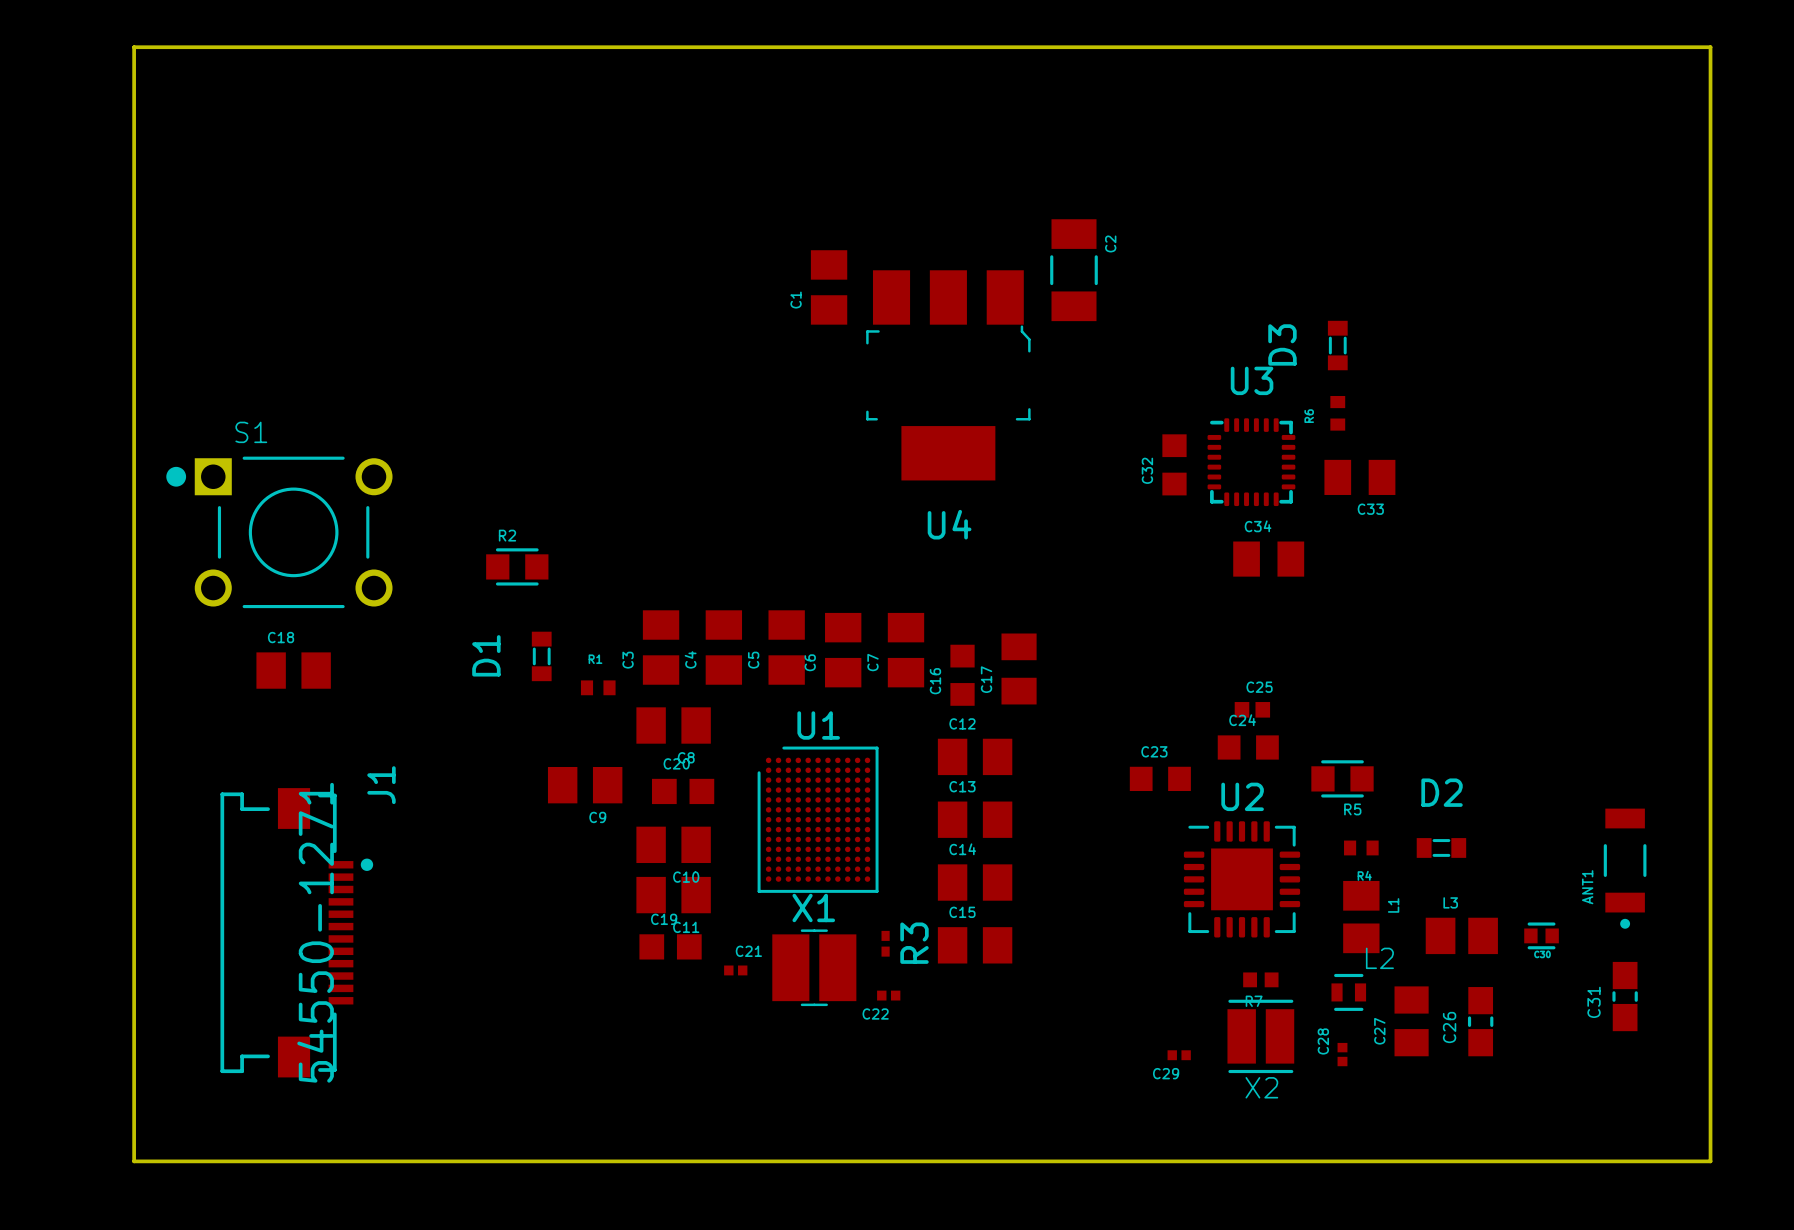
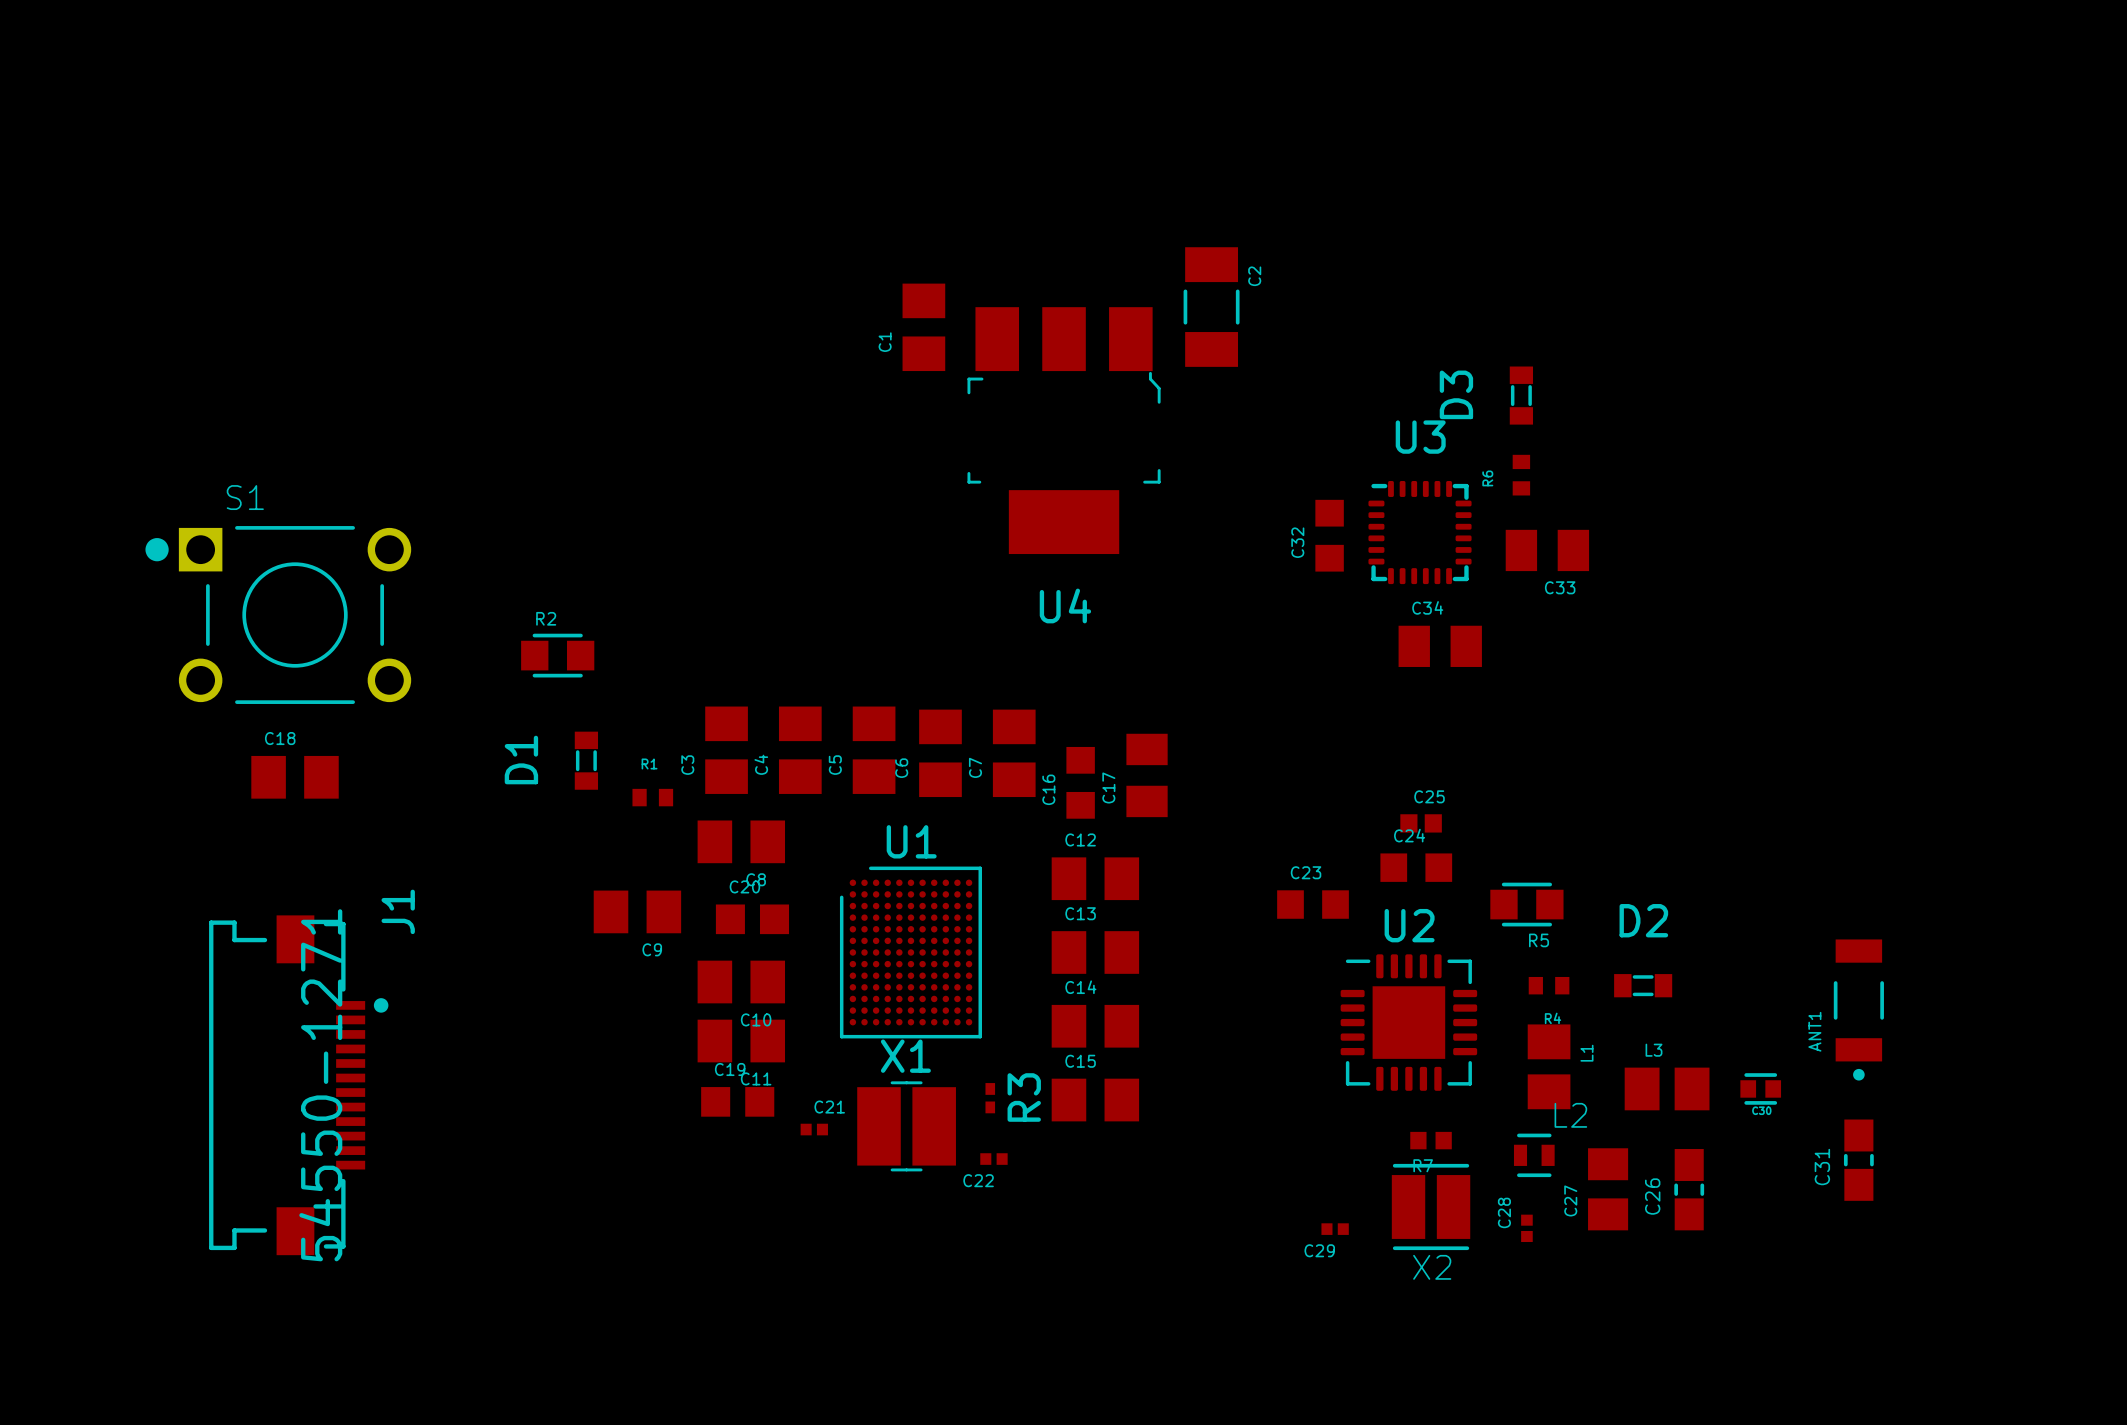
board edge: (134, 47) (1710, 47) (1710, 1161) (134, 1161) (134, 47) -> none

